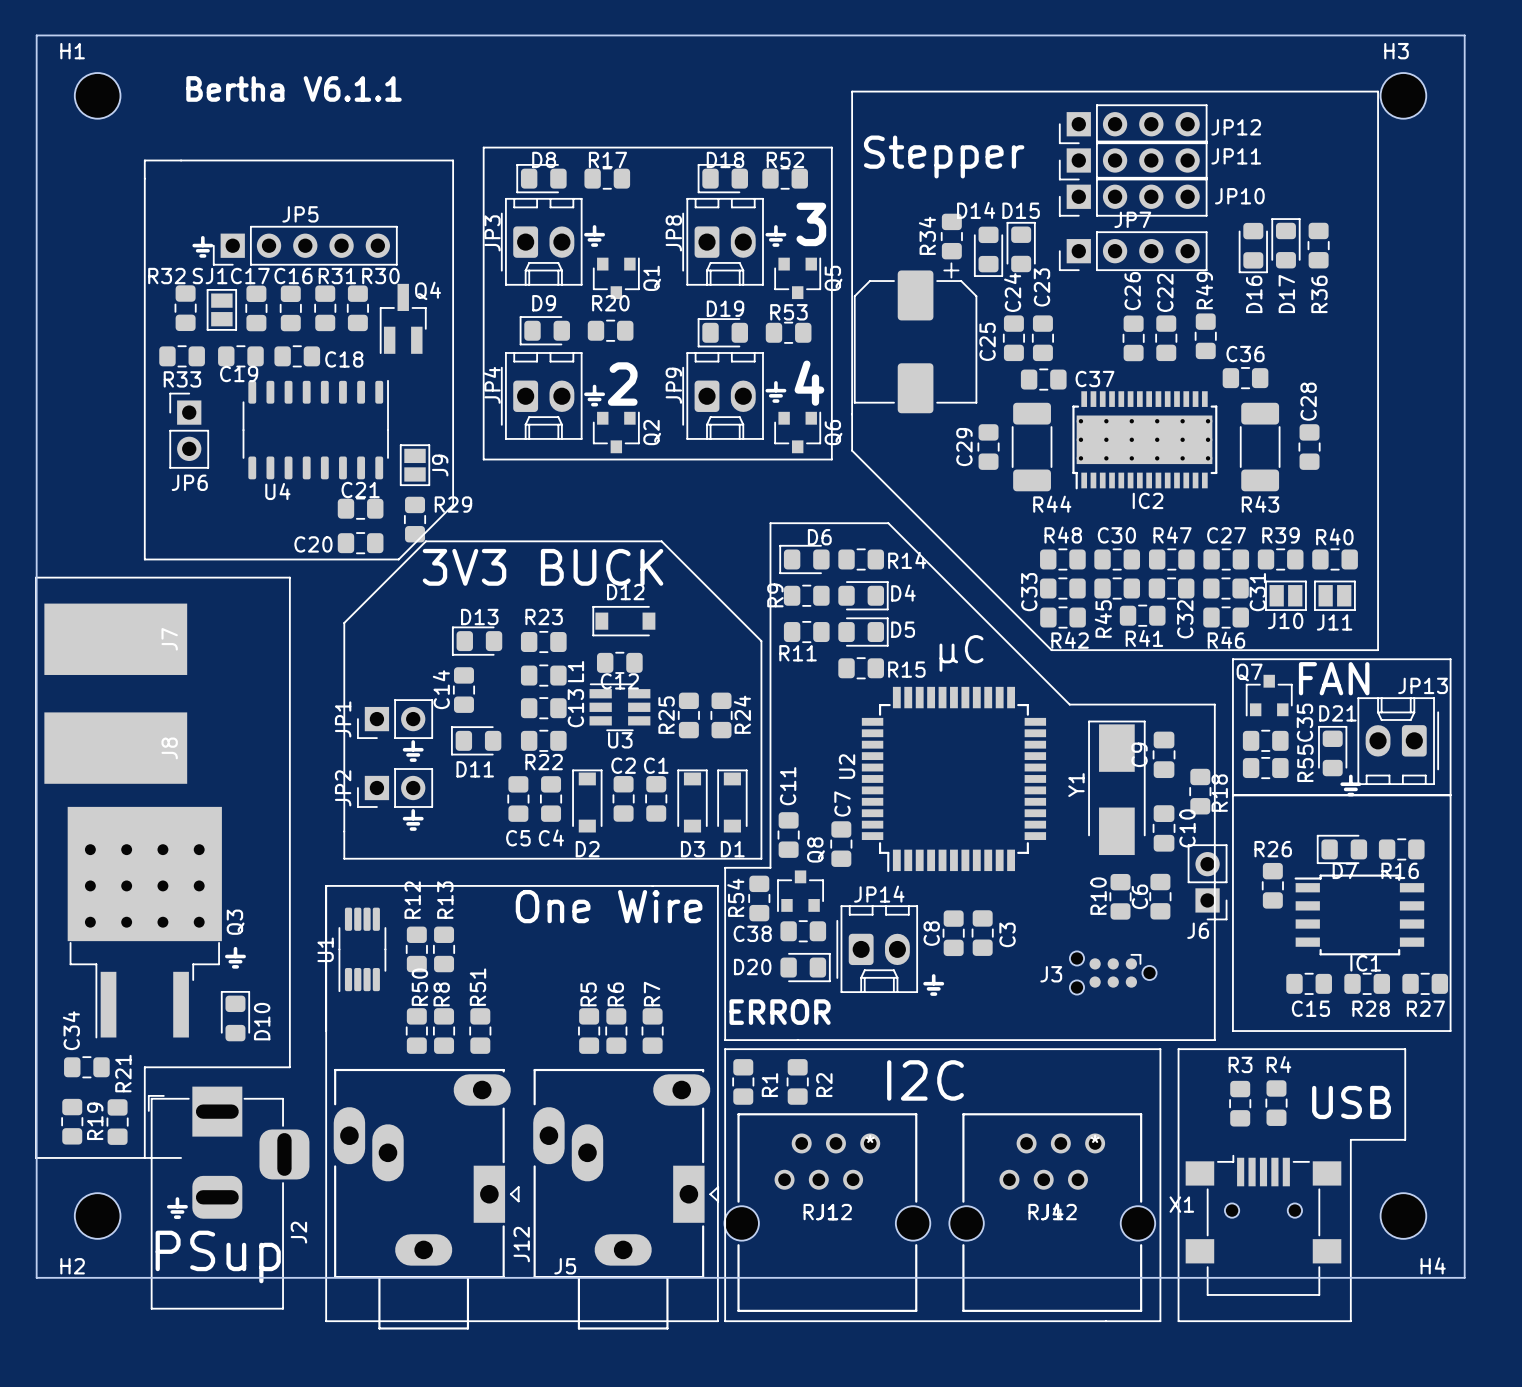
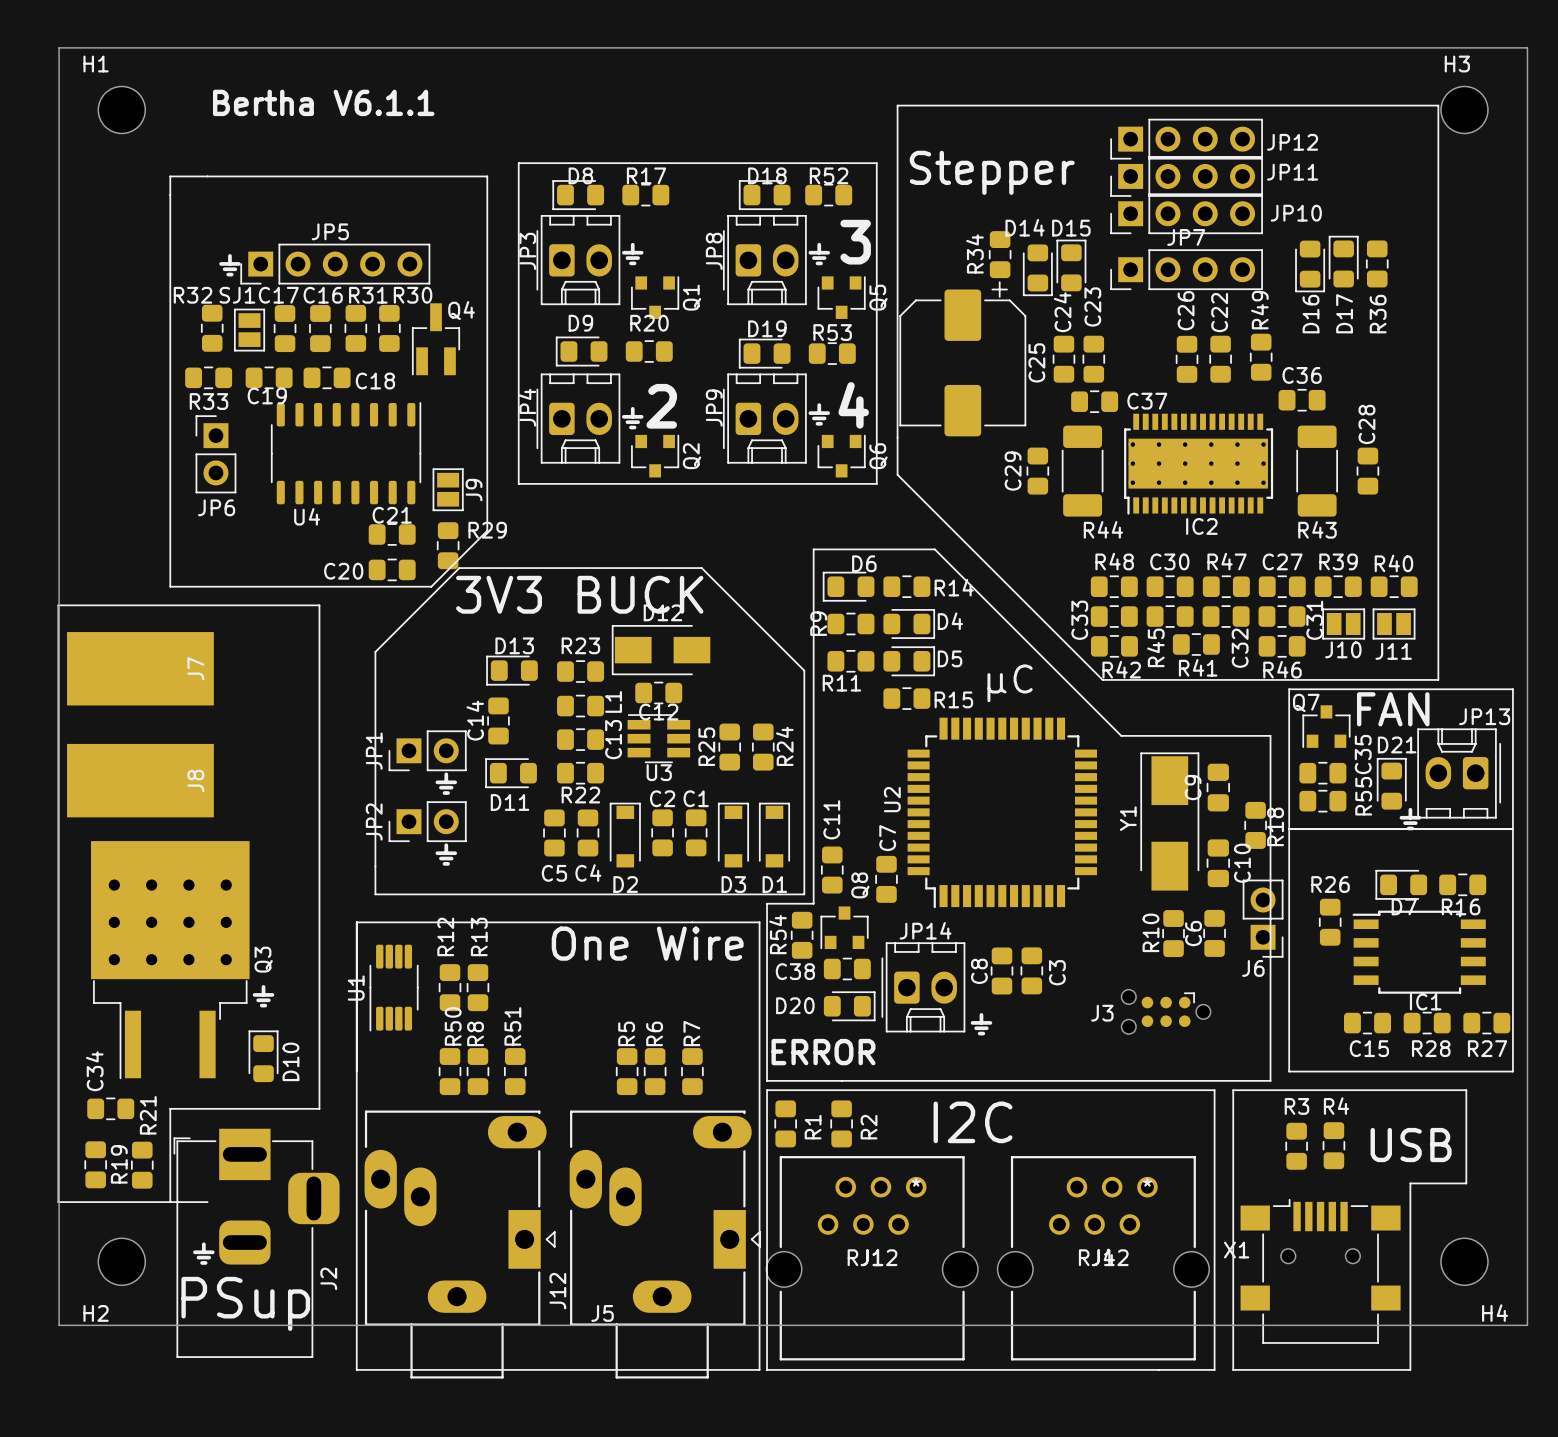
D12 footprint: [592, 606, 656, 637] -> [611, 625, 711, 676]

